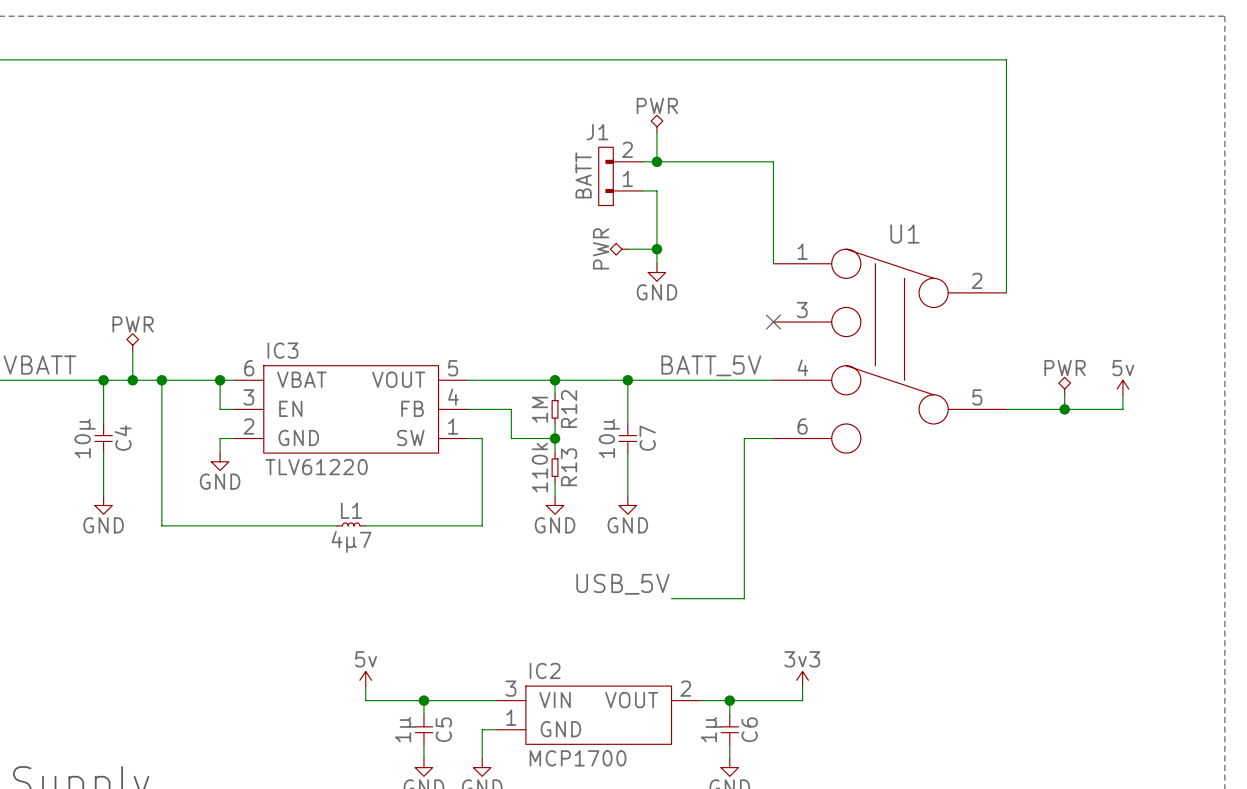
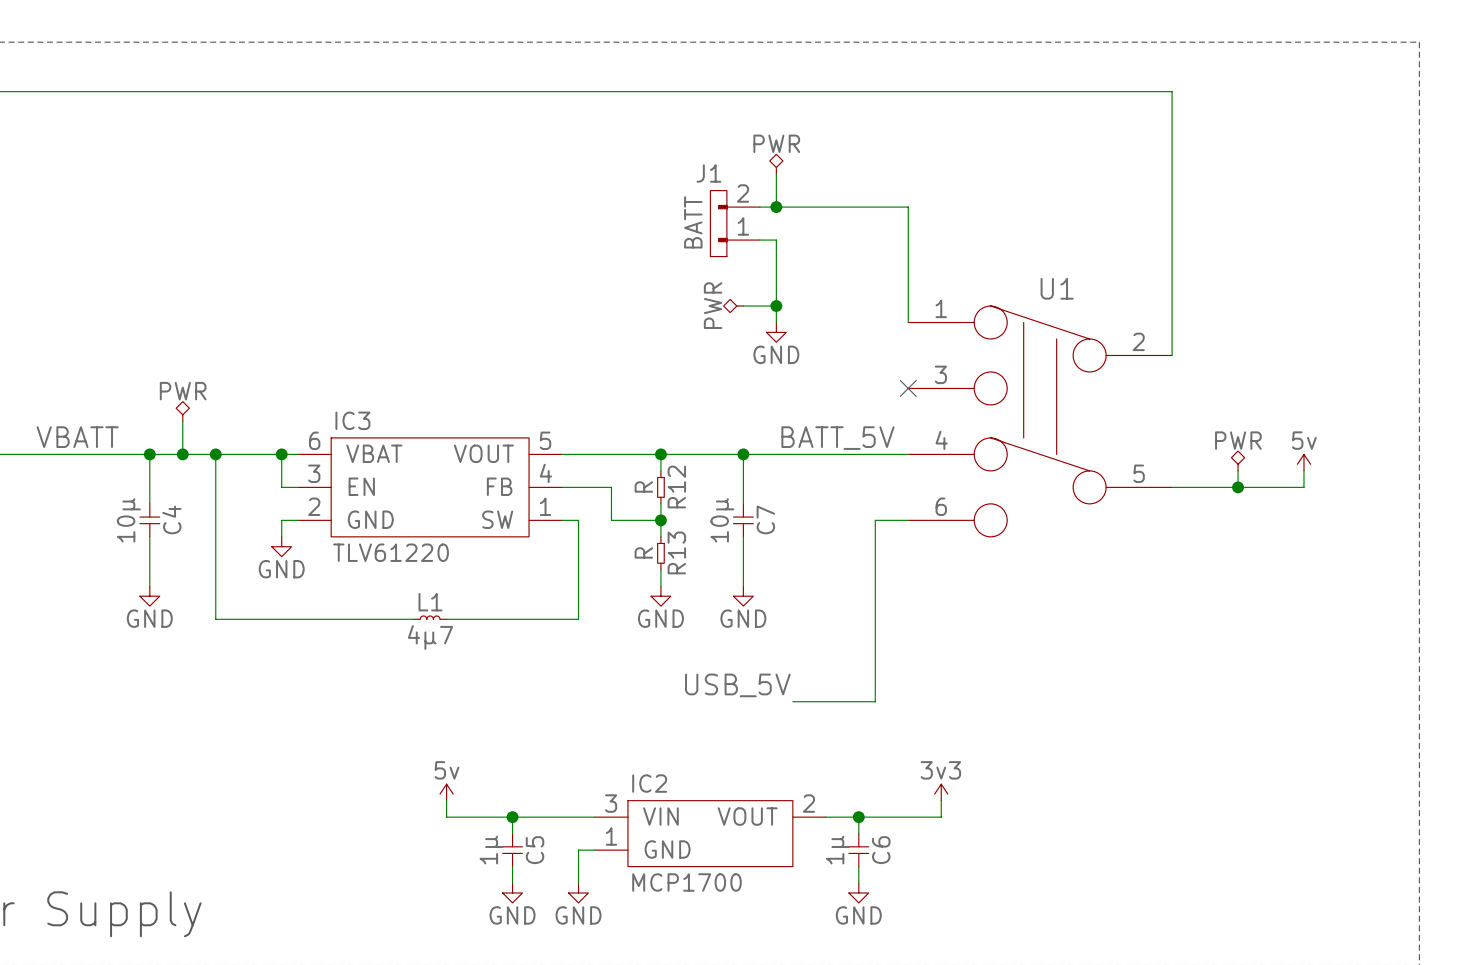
R12 value: 1M (539, 409) -> R (643, 486)
R13 value: 110k (539, 467) -> R (643, 552)

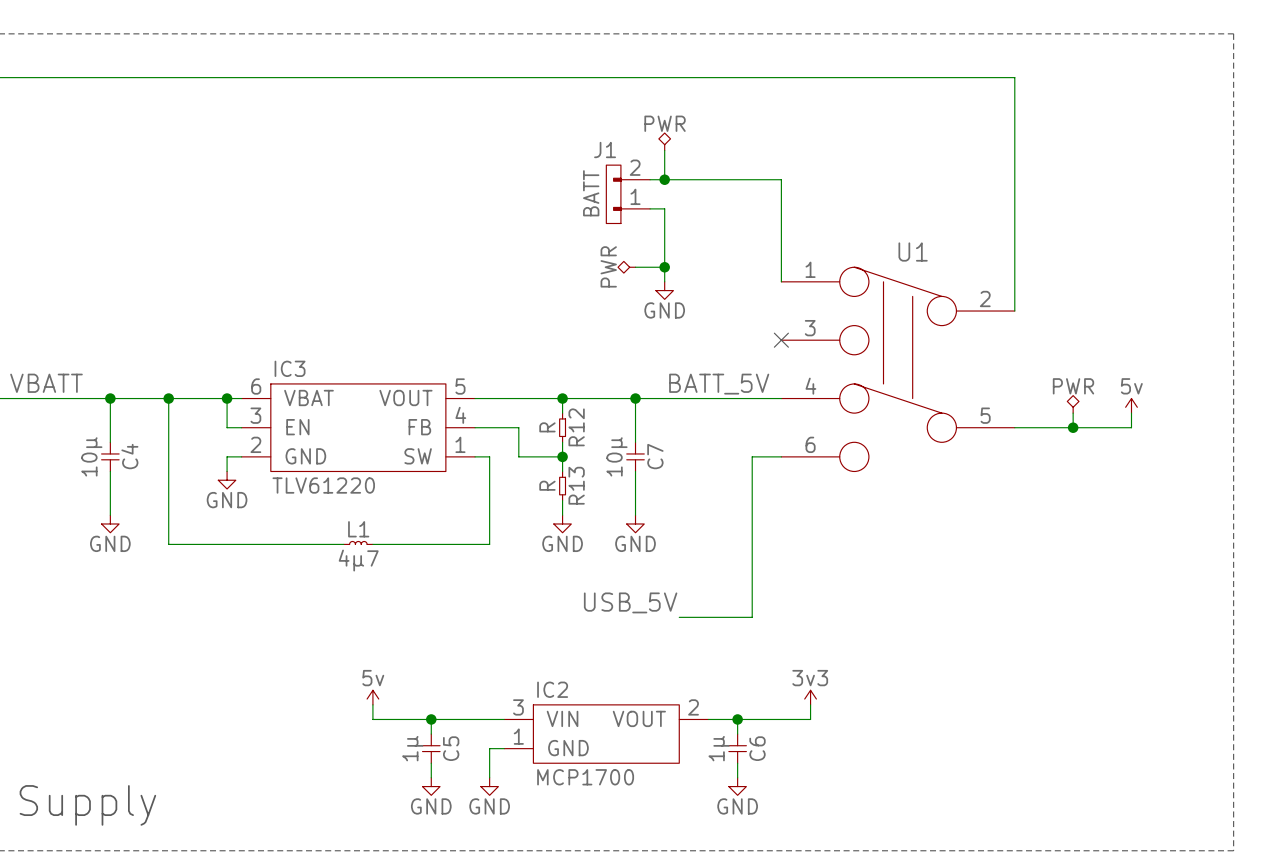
power symbol: PWR (182, 411) -> none
wire: (182, 421) (182, 454) -> none
junction: (182, 454) -> none

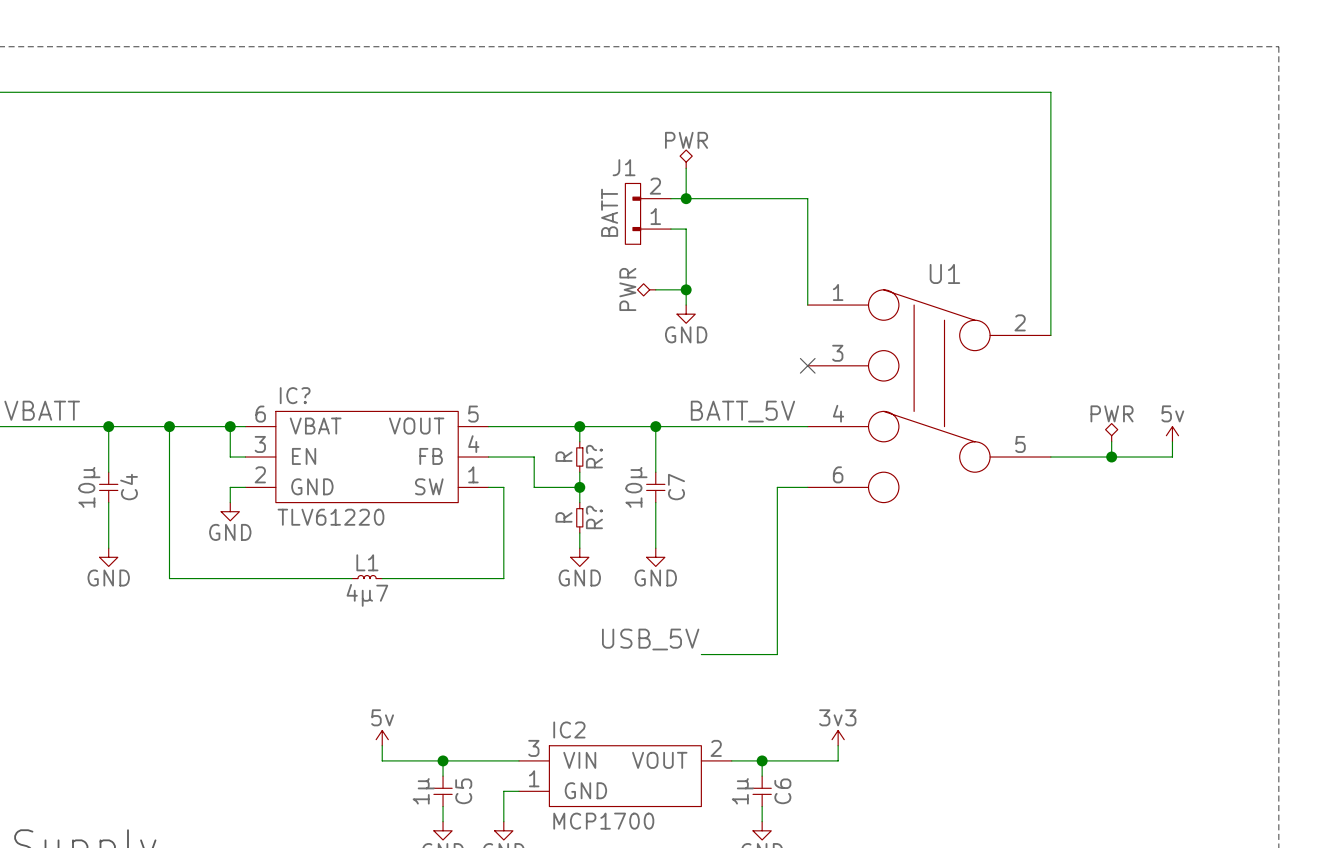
IC3 name: IC3 (290, 368) -> IC? (295, 395)
R12 name: R12 (576, 427) -> R? (594, 456)
R13 name: R13 (576, 485) -> R? (594, 517)

